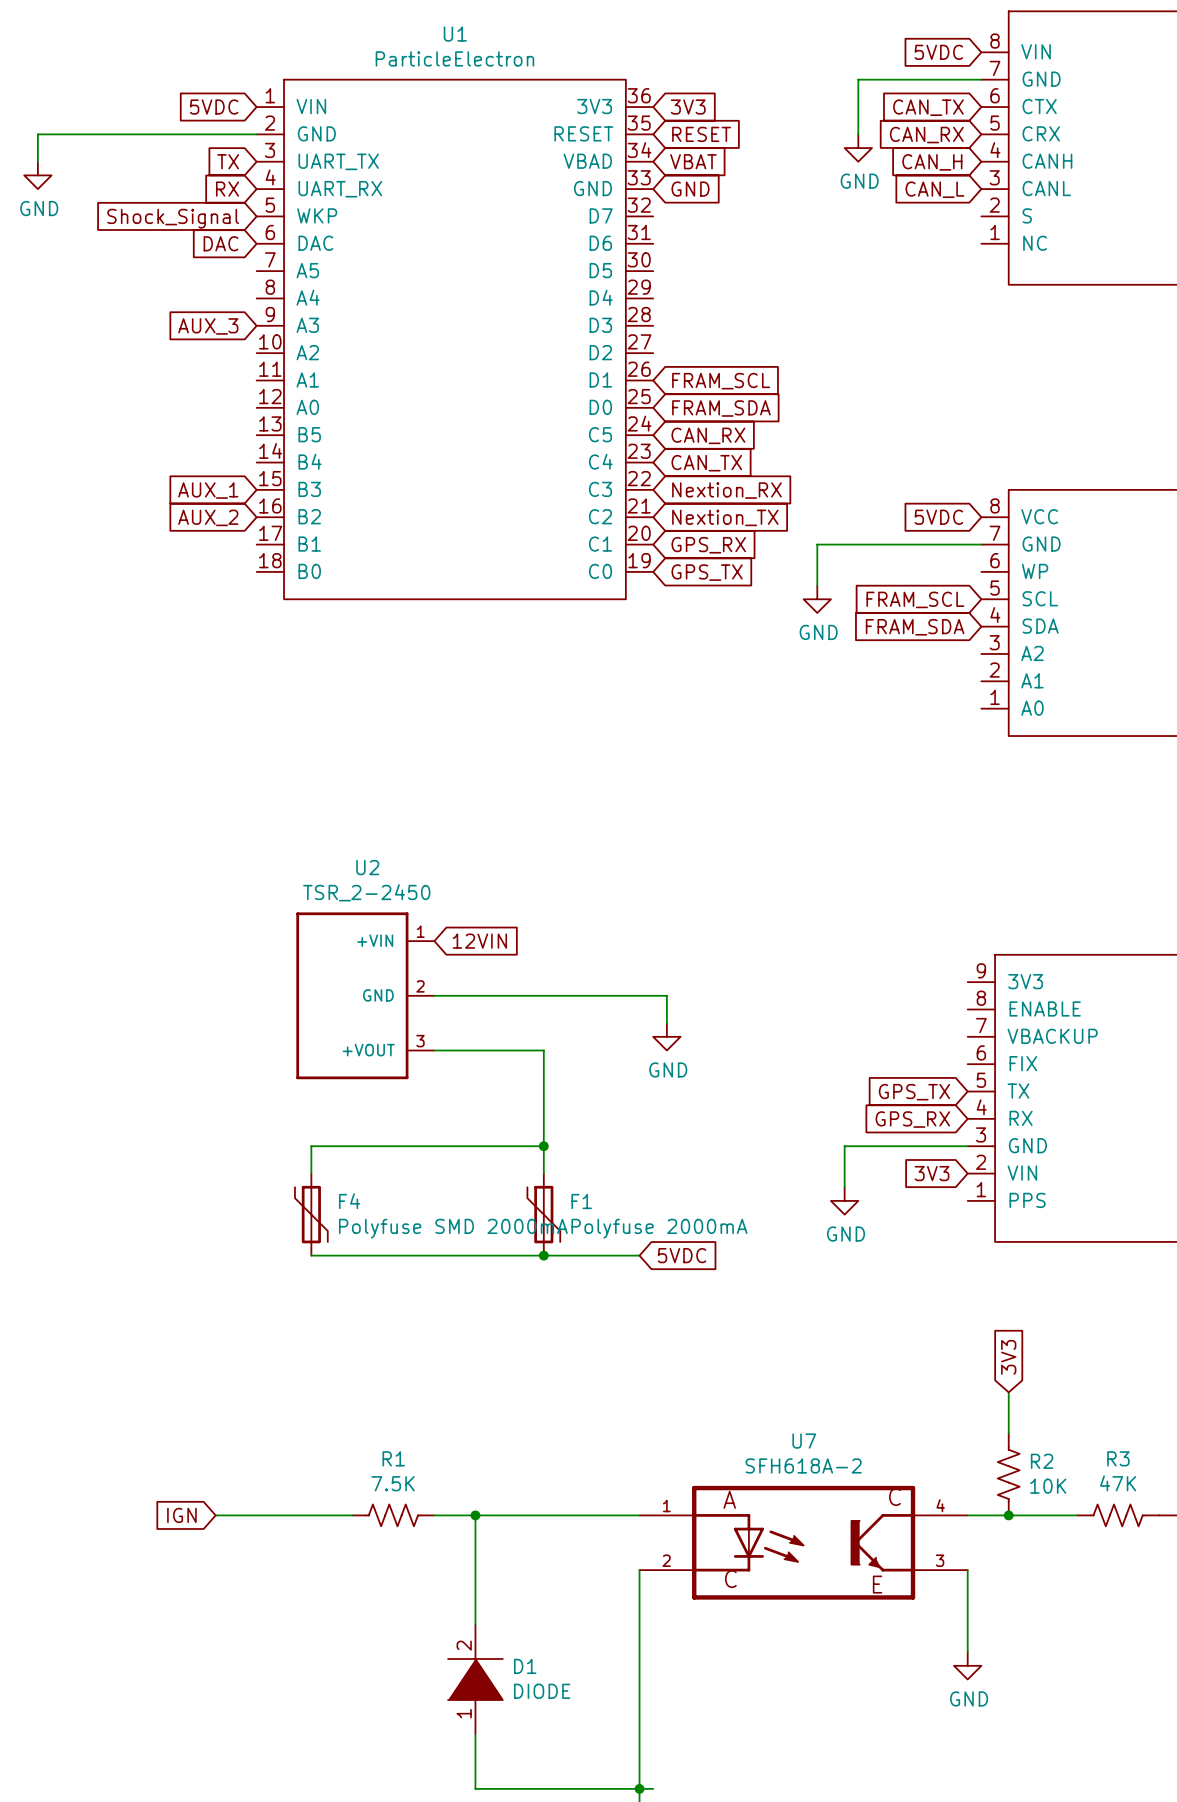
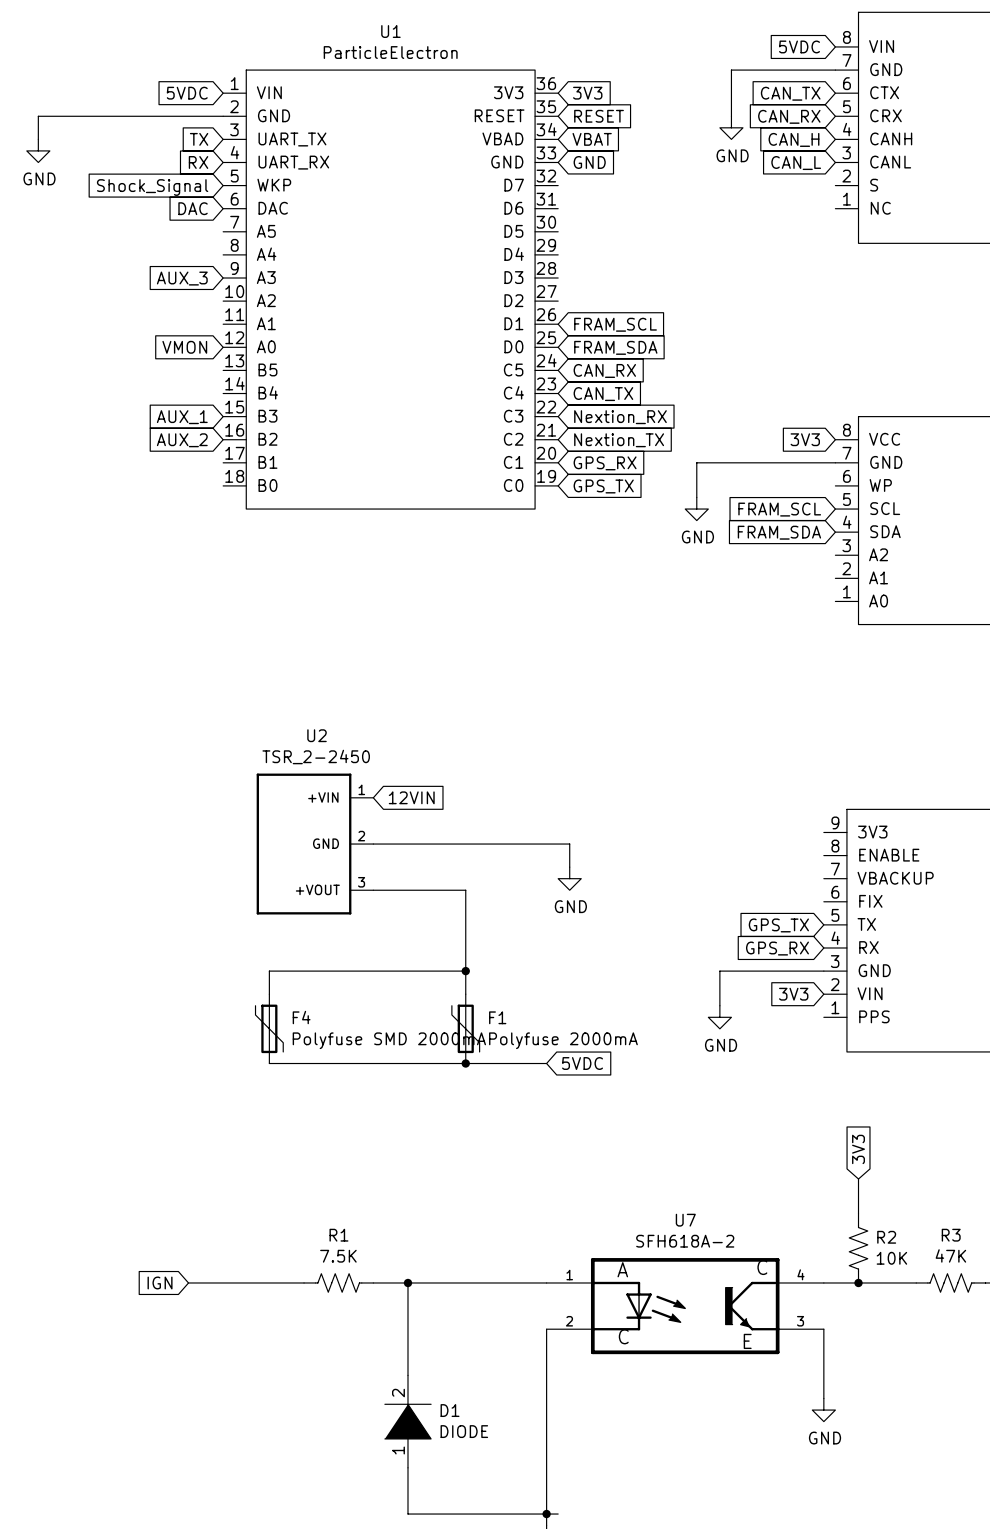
global label: none -> VMON (184, 347)
global label: 5VDC (938, 517) -> 3V3 (805, 439)

